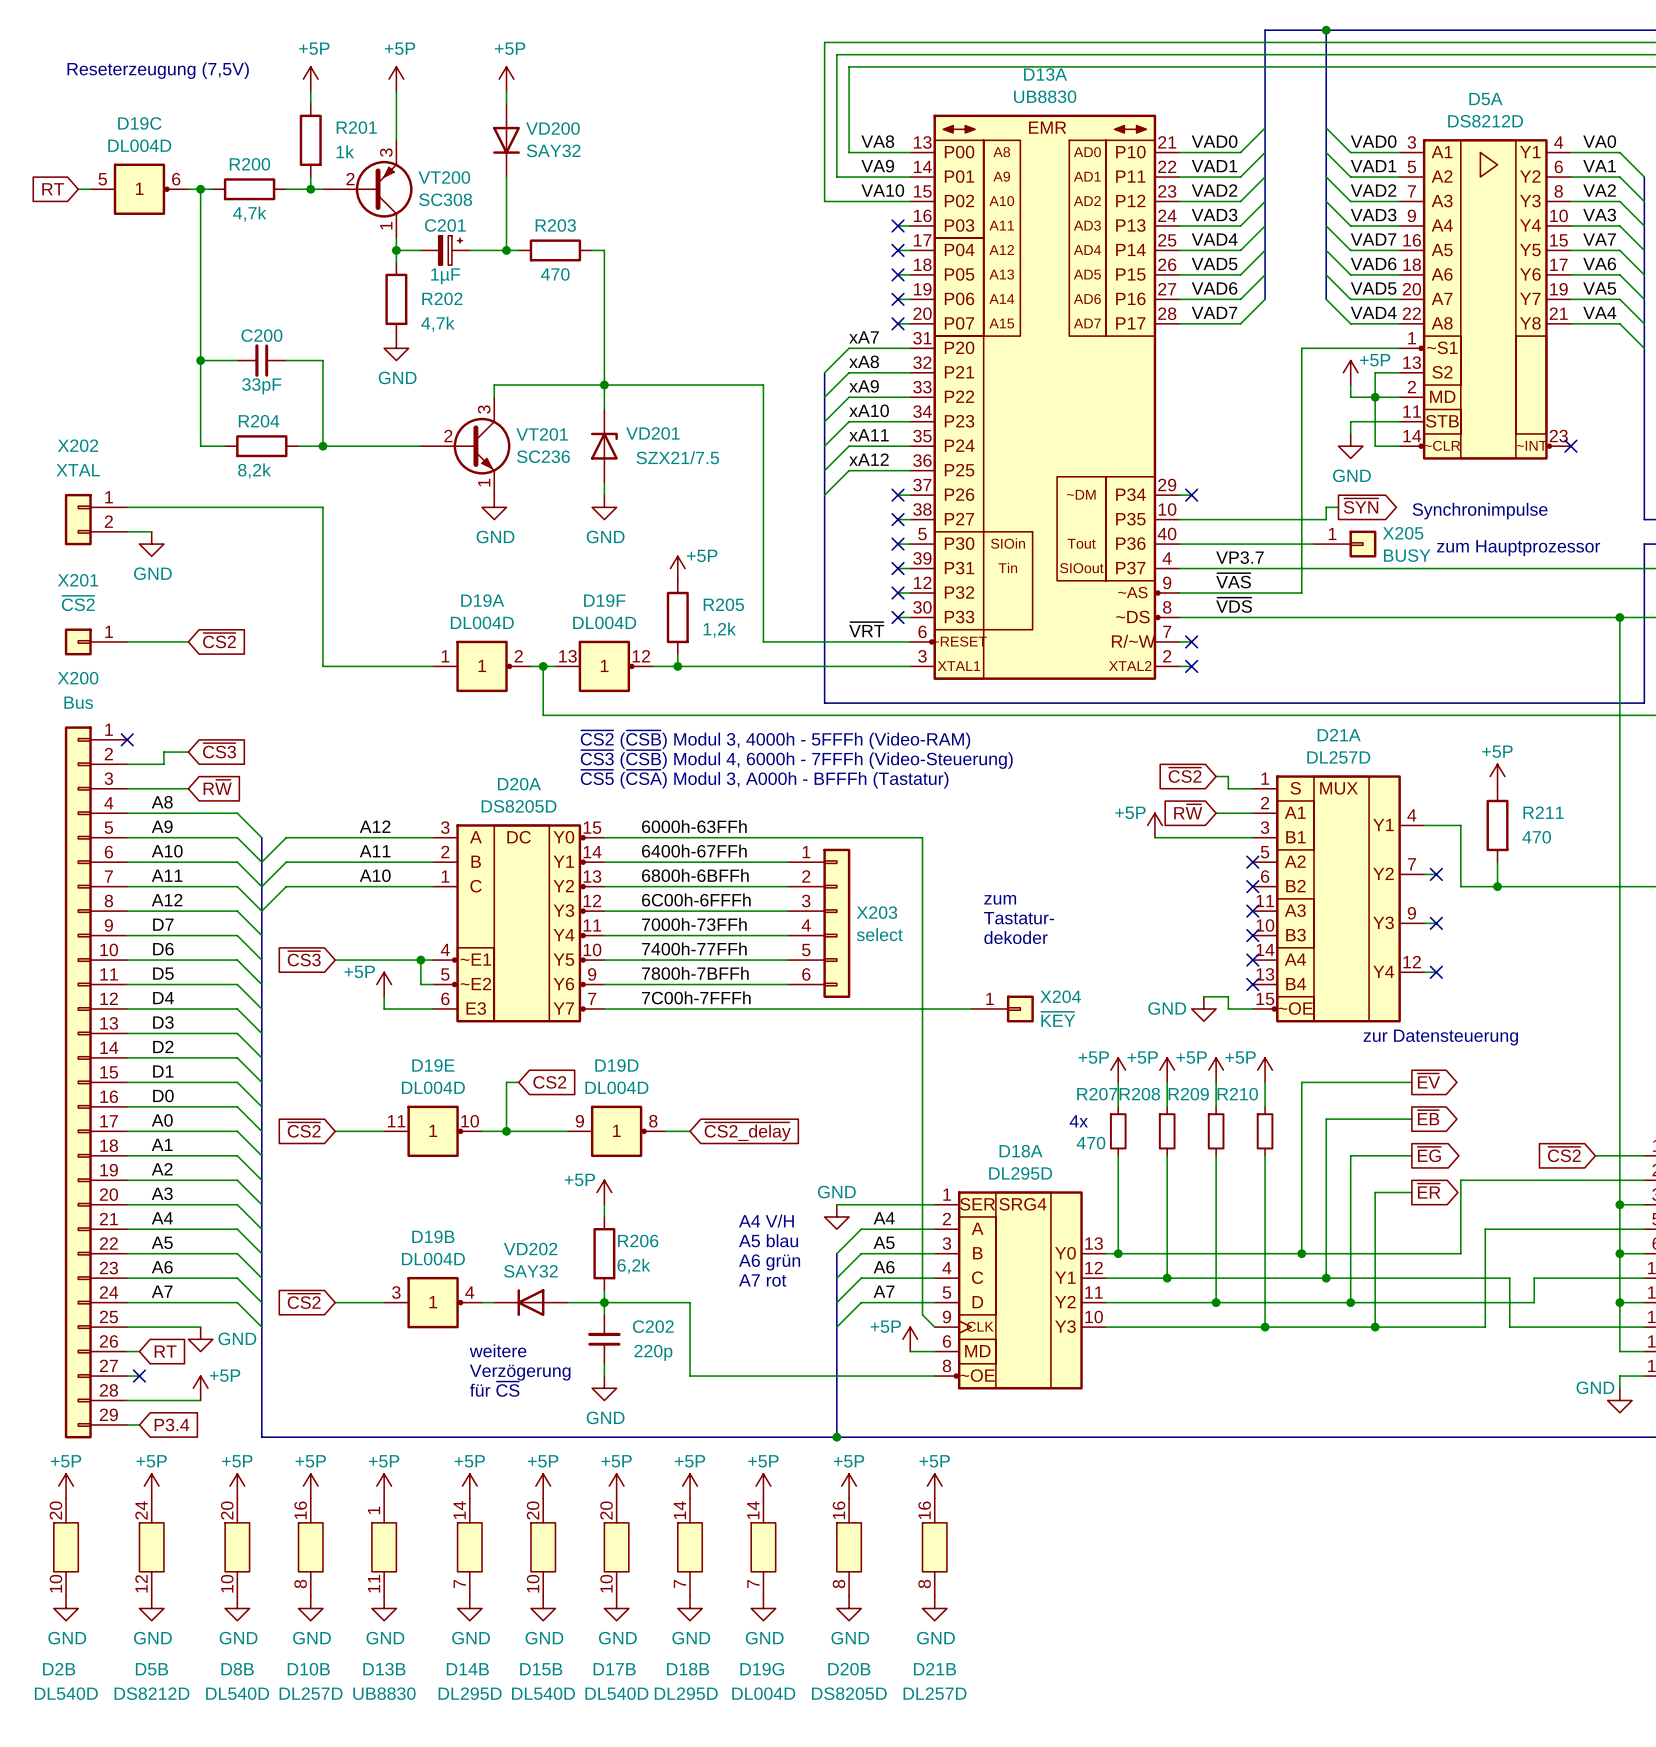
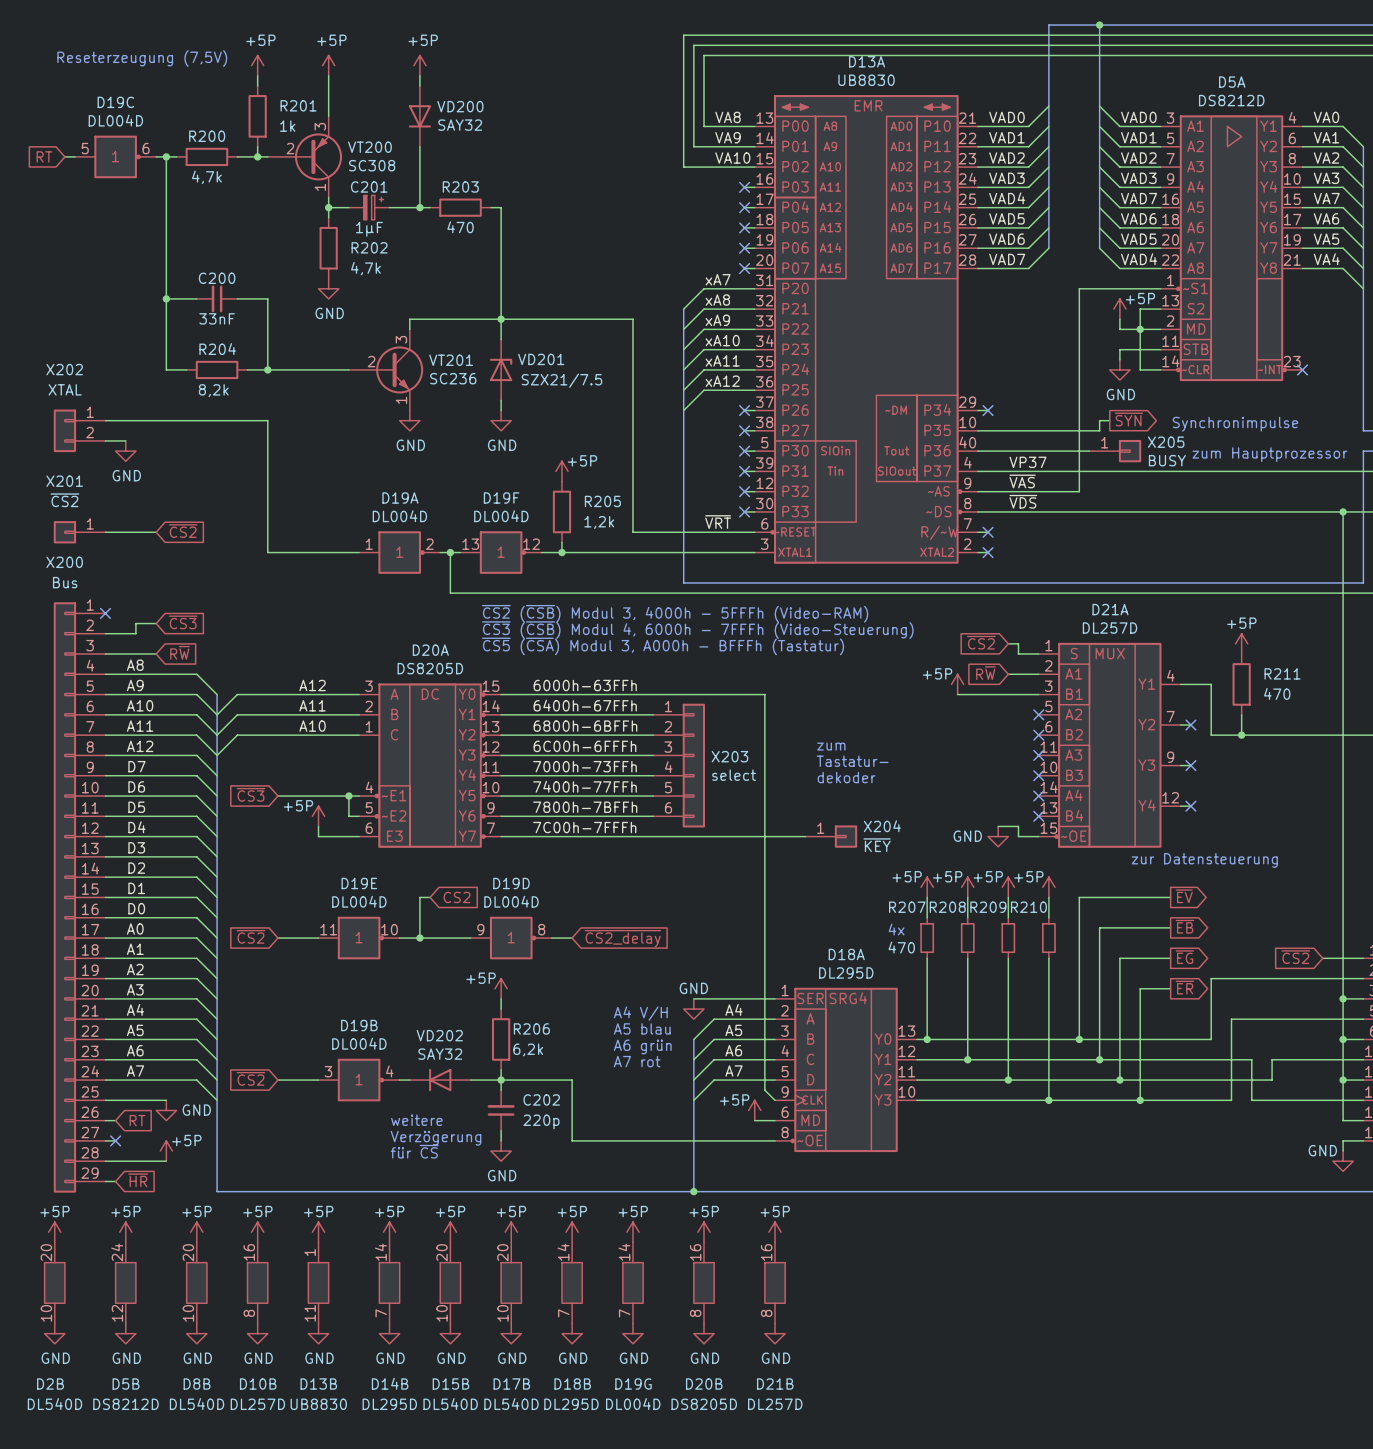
C200 value: 33pF (261, 386) -> 33nF (217, 318)
label: VP3.7 (1239, 557) -> VP37 (1027, 462)
global label: P3.4 (171, 1424) -> ~{HR} (138, 1180)

